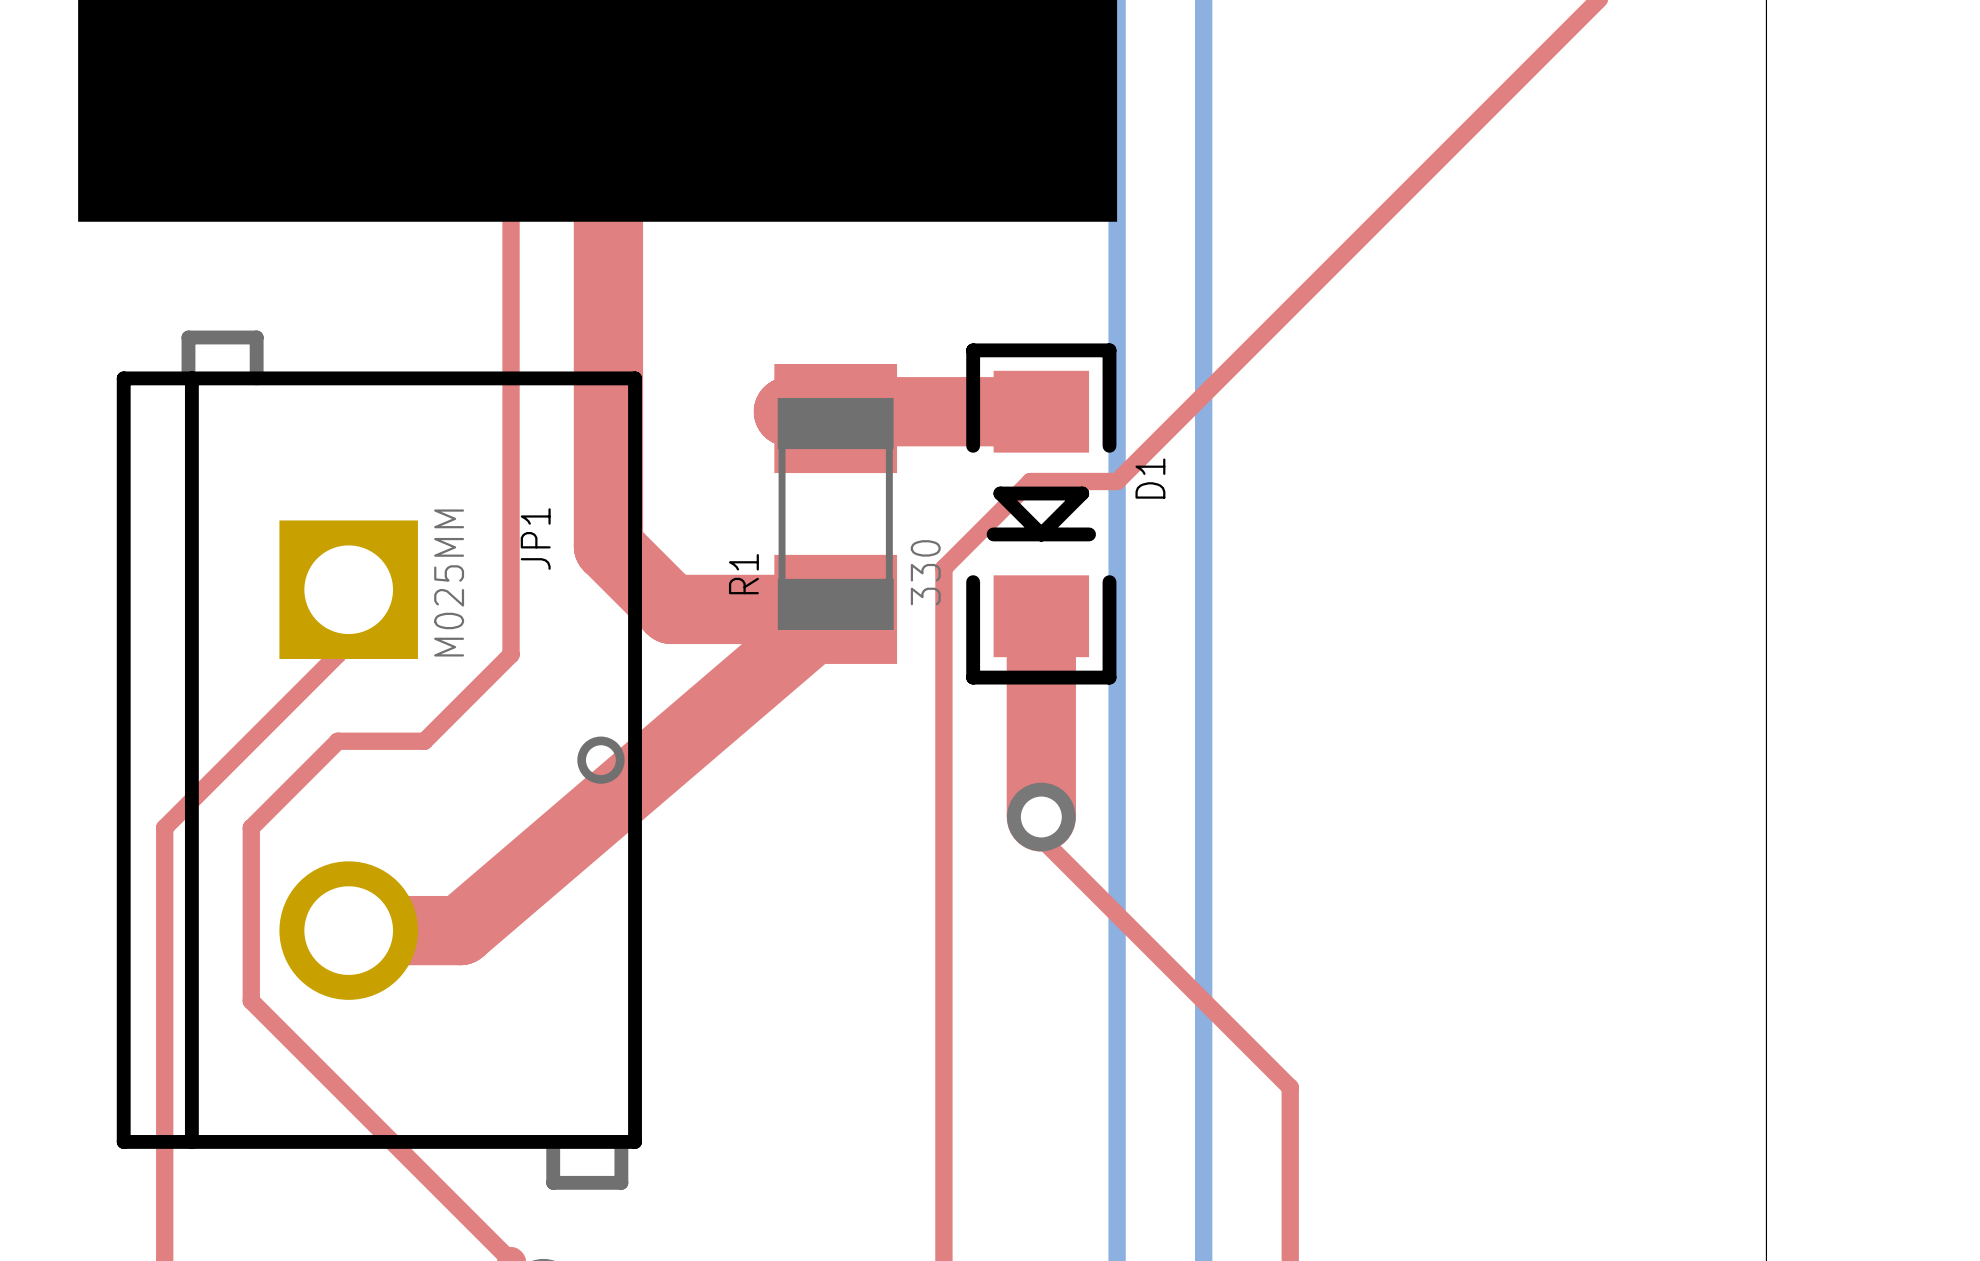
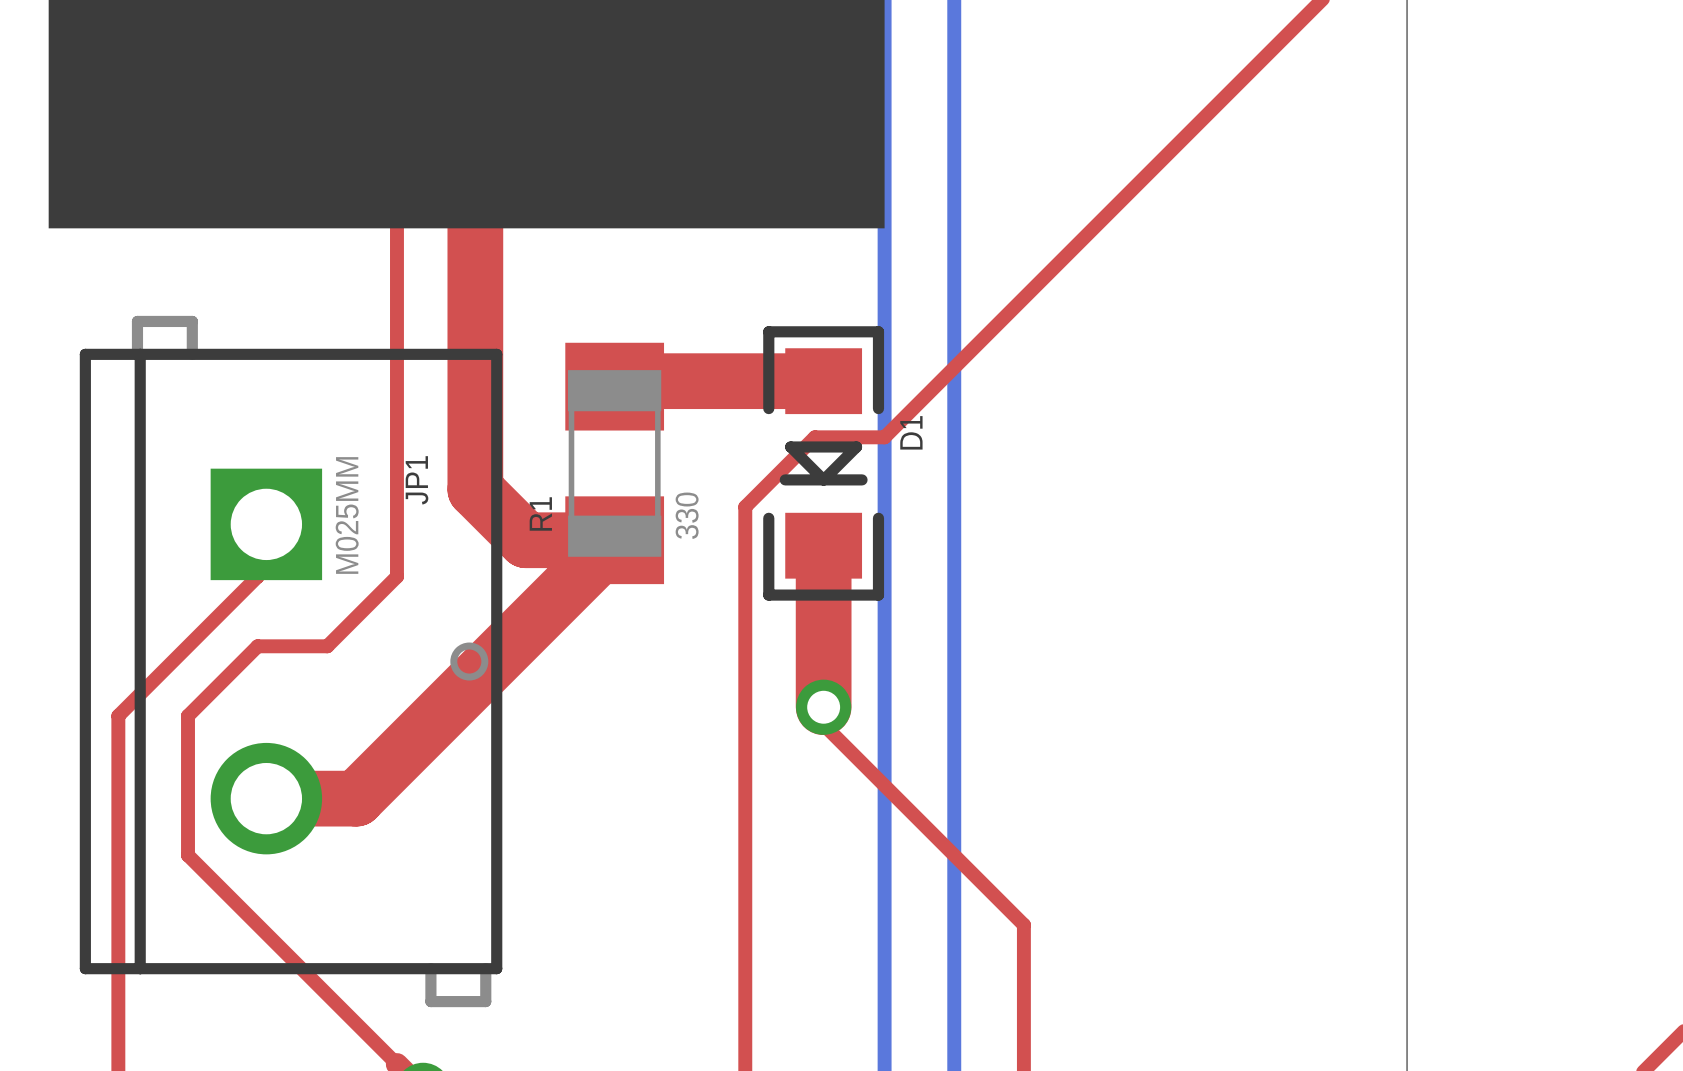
R1 position: (835, 513) -> (614, 463)
top track: (781, 609) (835, 609) (460, 930) -> (614, 540) (356, 798)

